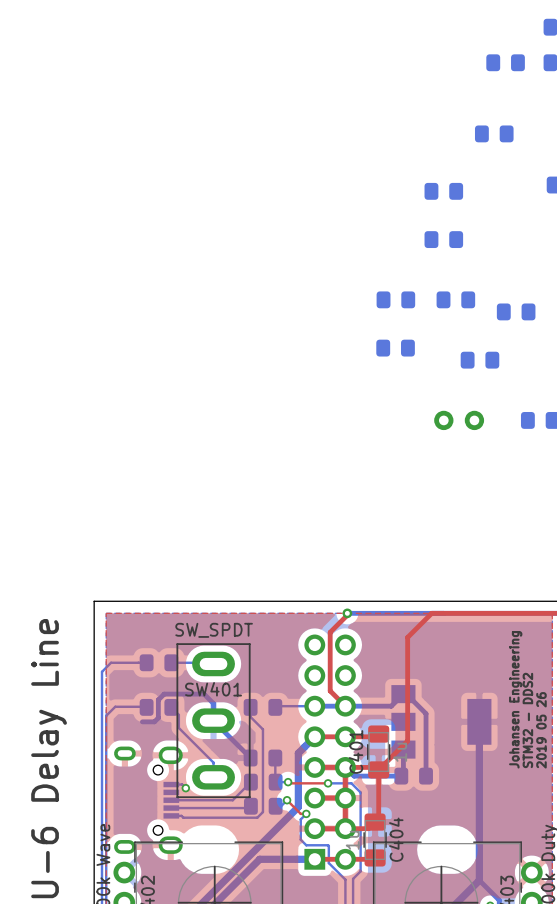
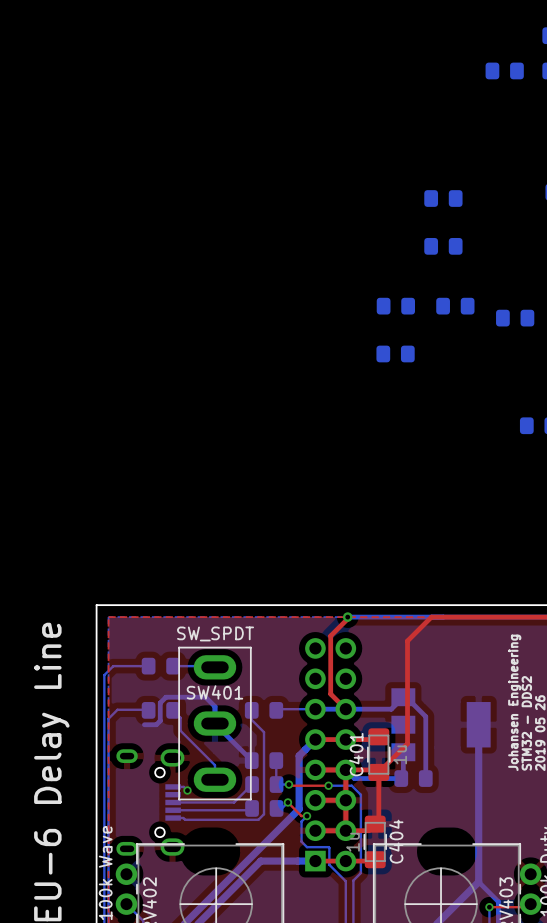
part: (494, 133) -> none
part: (479, 360) -> none
part: (459, 420) -> none

